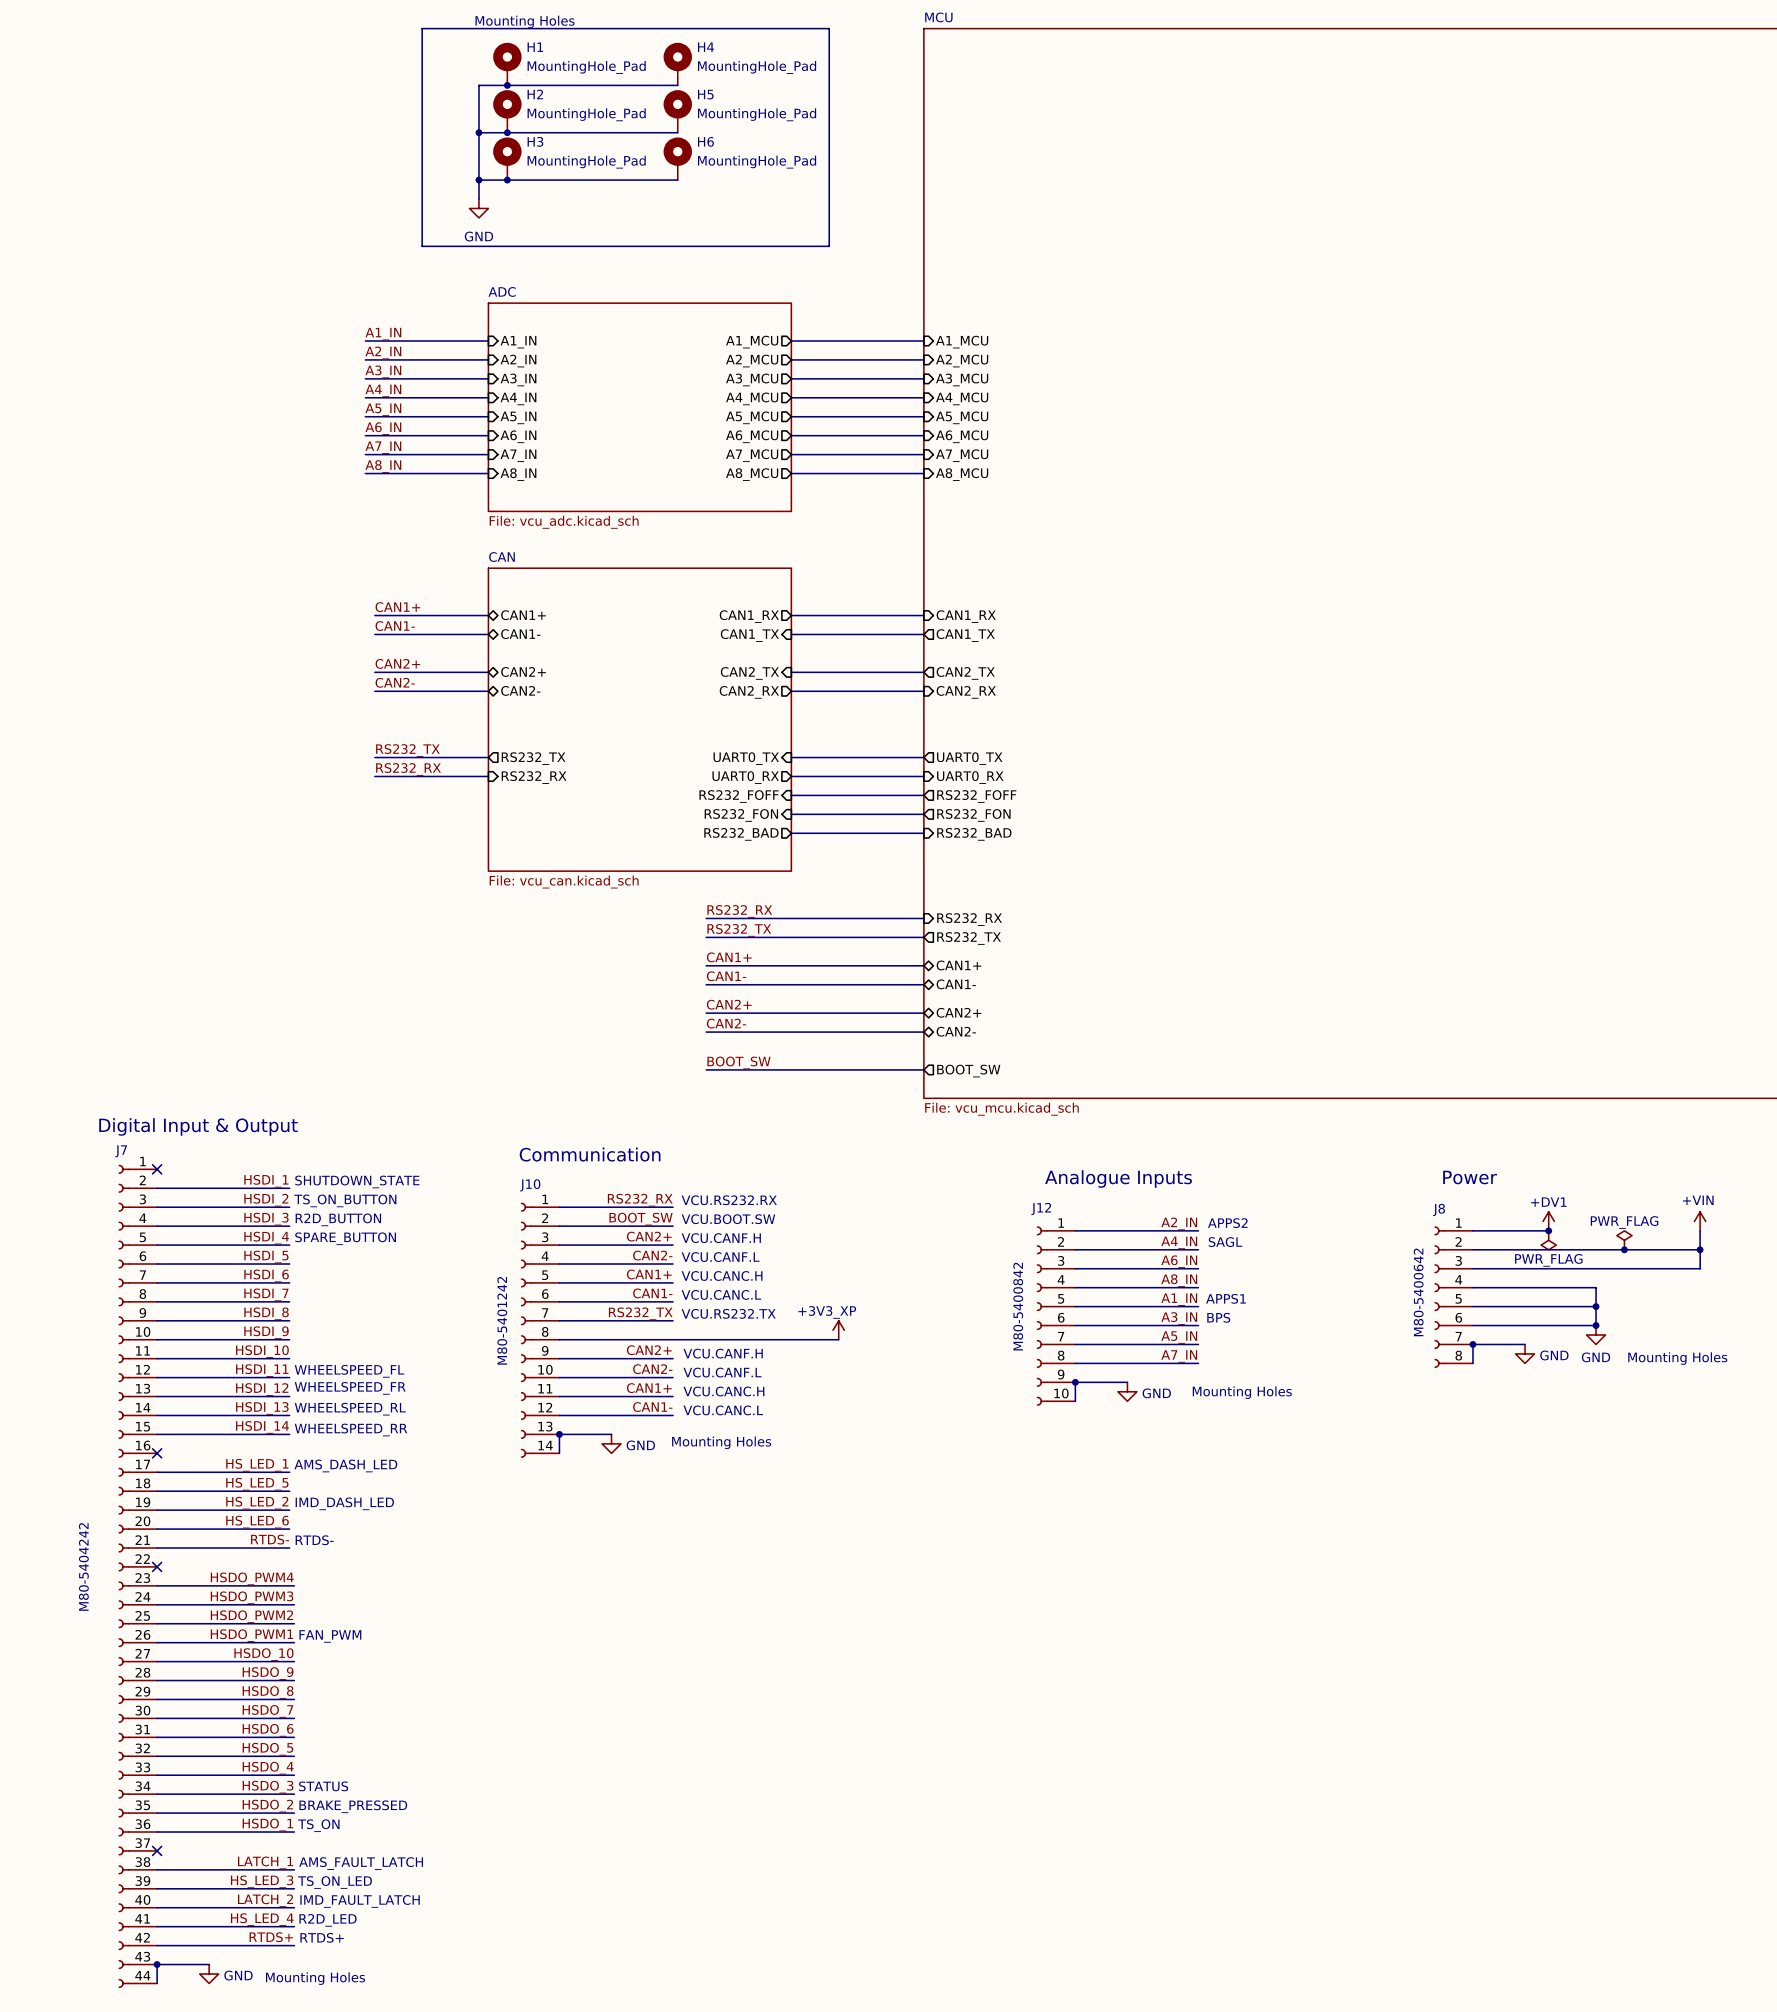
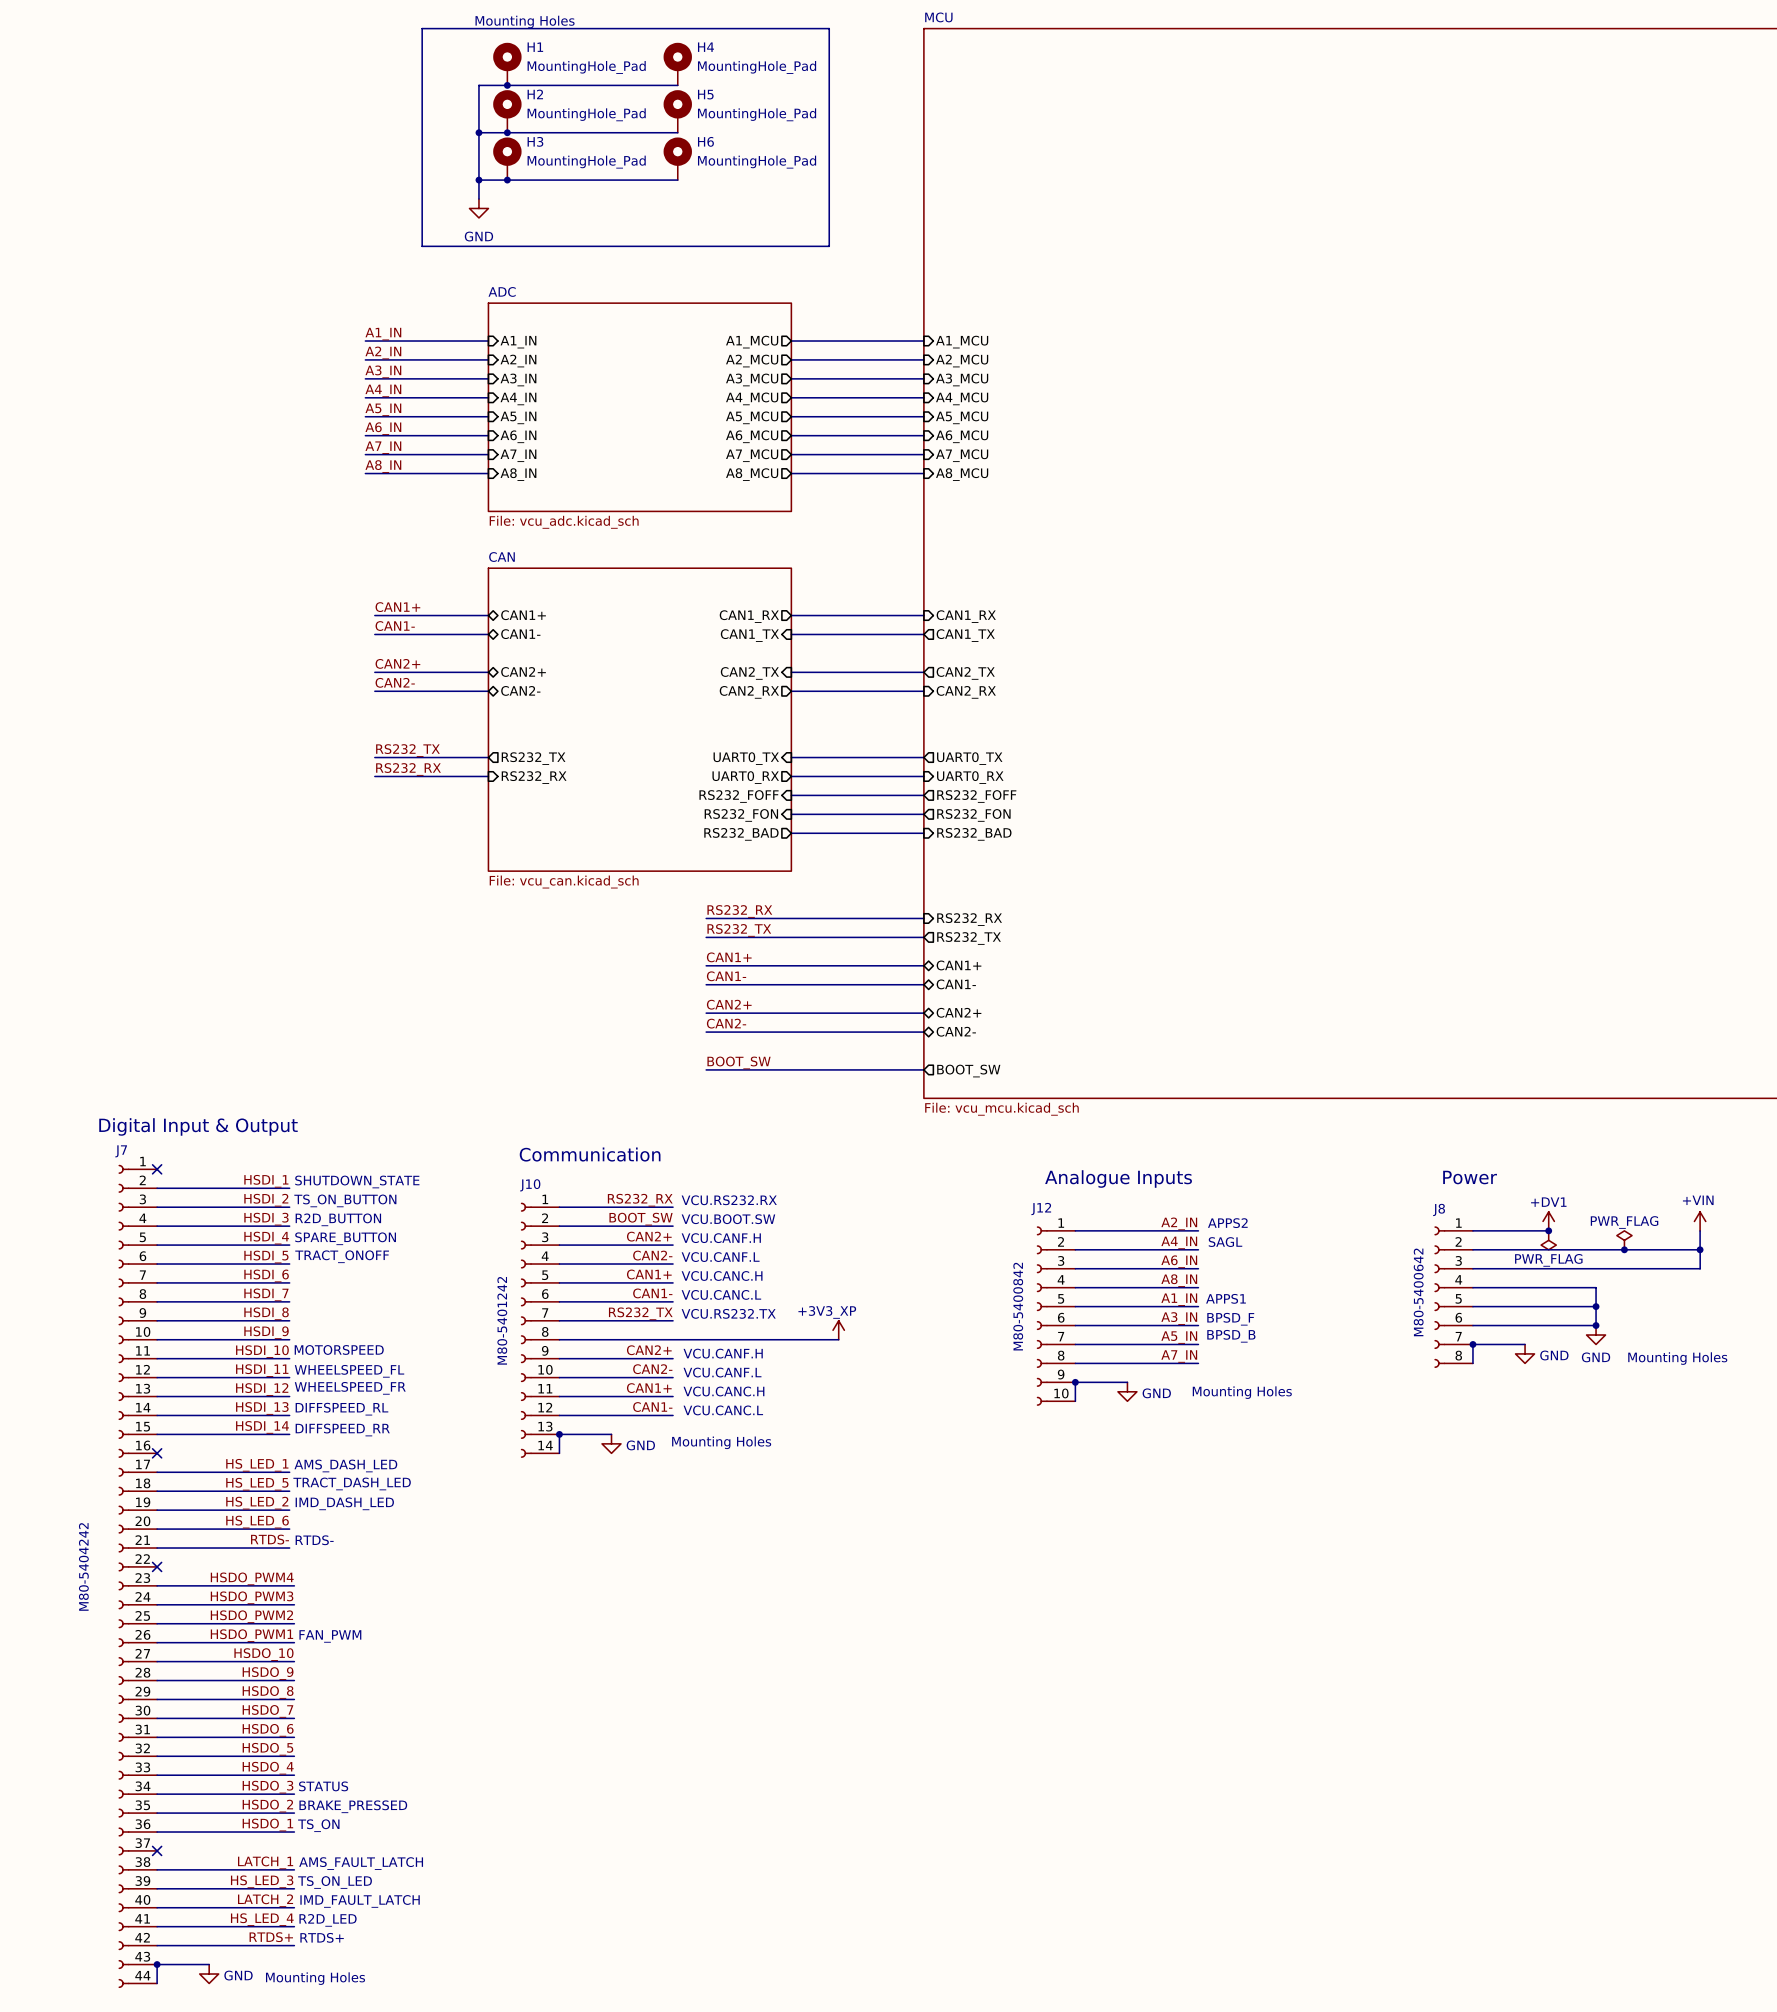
text: none -> TRACT_ONOFF (342, 1256)
text: BPS (1218, 1317) -> BPSD_F (1230, 1319)
text: none -> BPSD_B (1231, 1336)
text: none -> MOTORSPEED (339, 1349)
text: WHEELSPEED_RL (350, 1409) -> DIFFSPEED_RL (341, 1409)
text: WHEELSPEED_RR (351, 1429) -> DIFFSPEED_RR (342, 1429)
text: none -> TRACT_DASH_LED (352, 1483)

